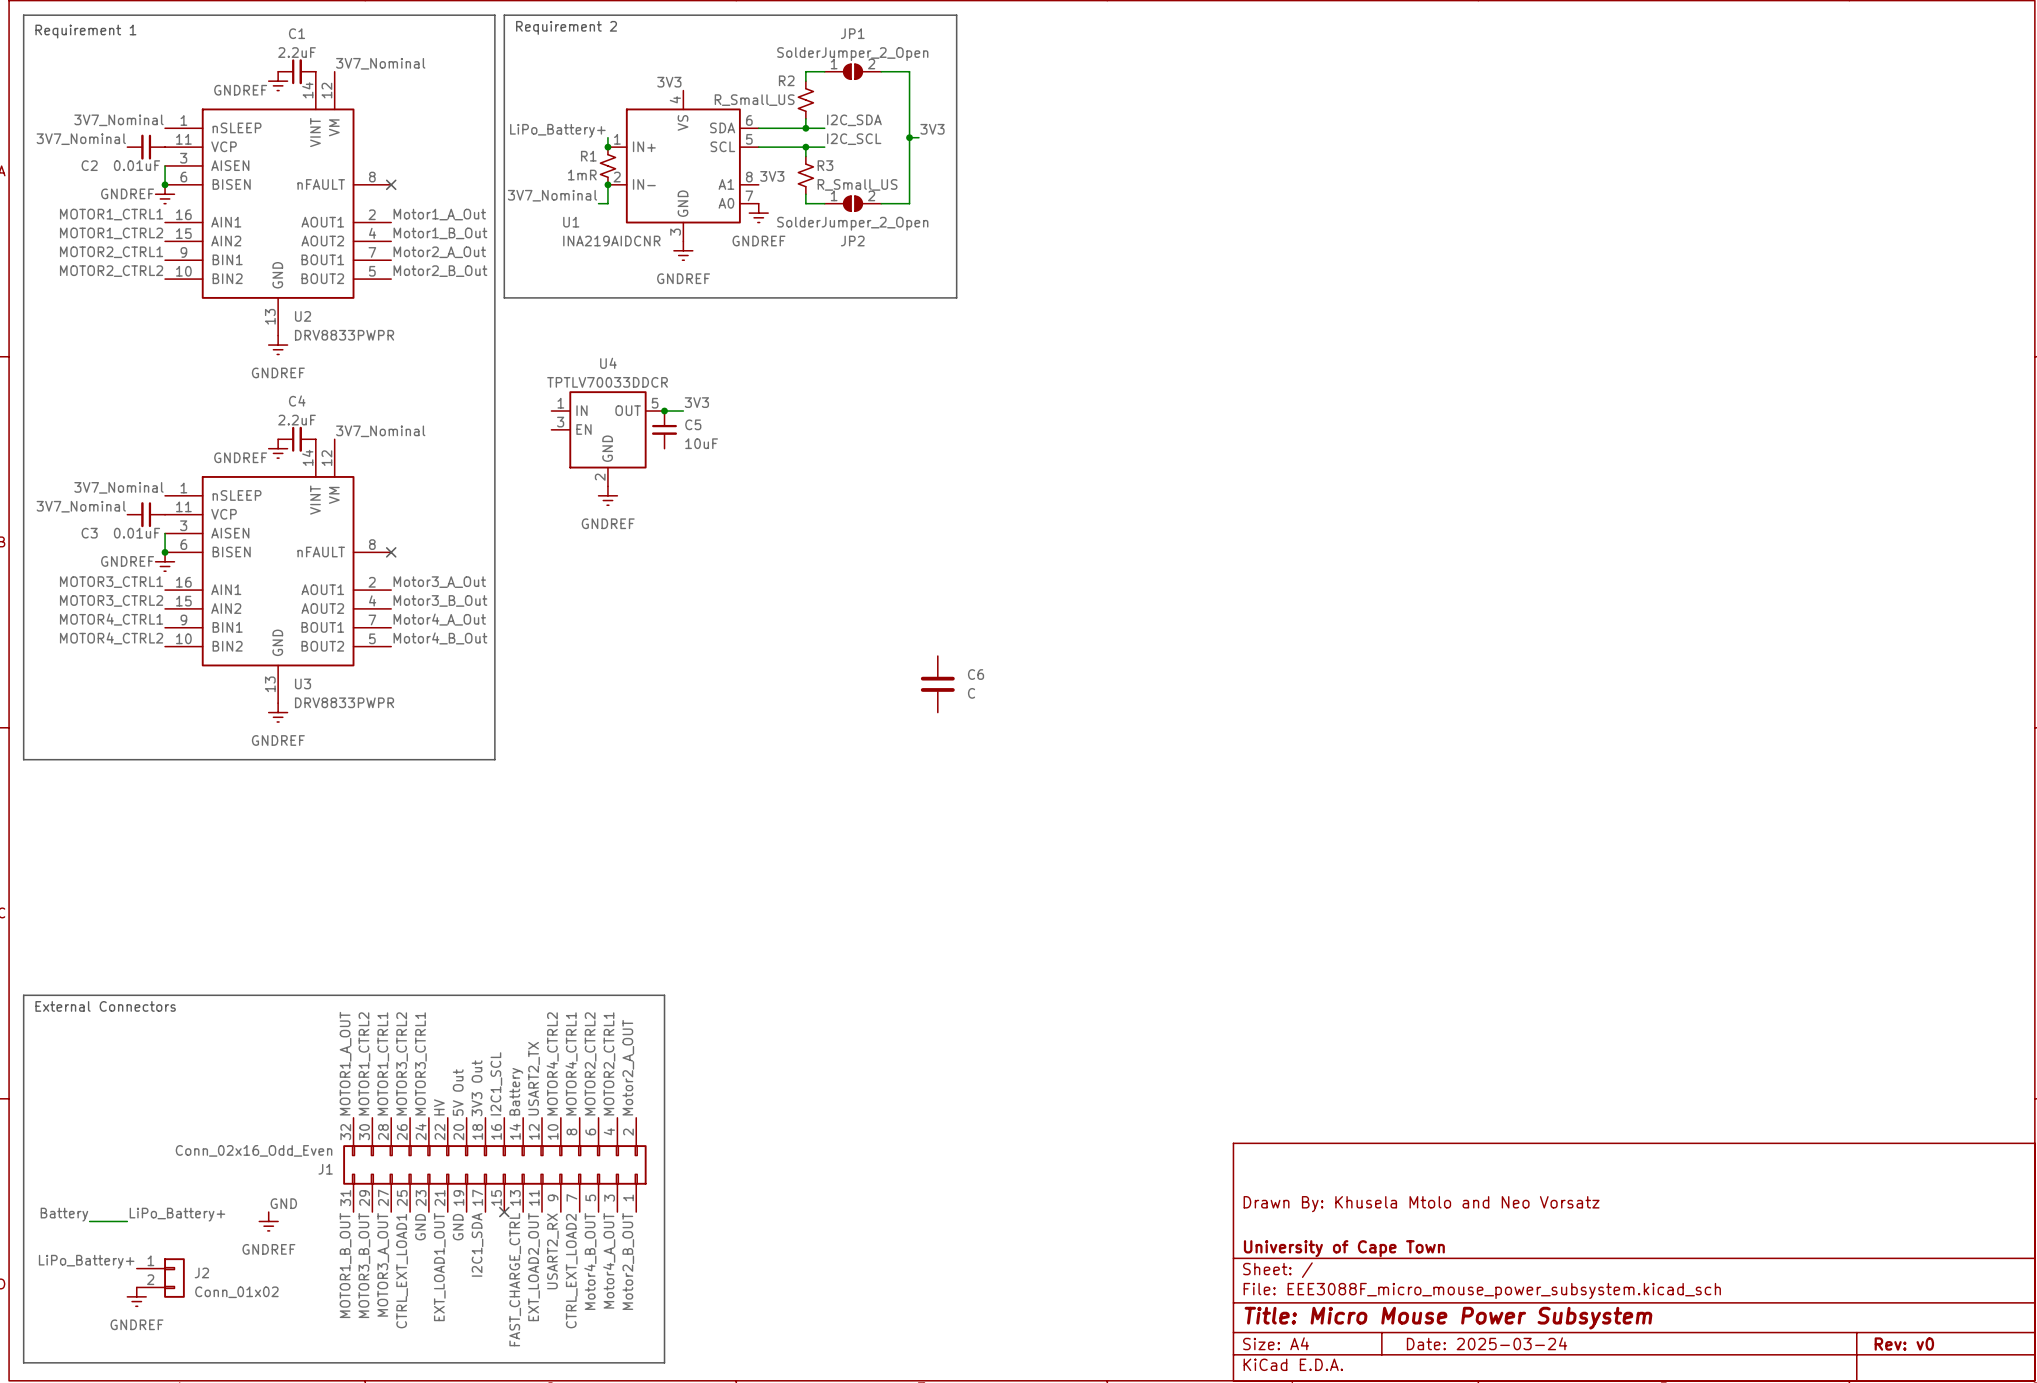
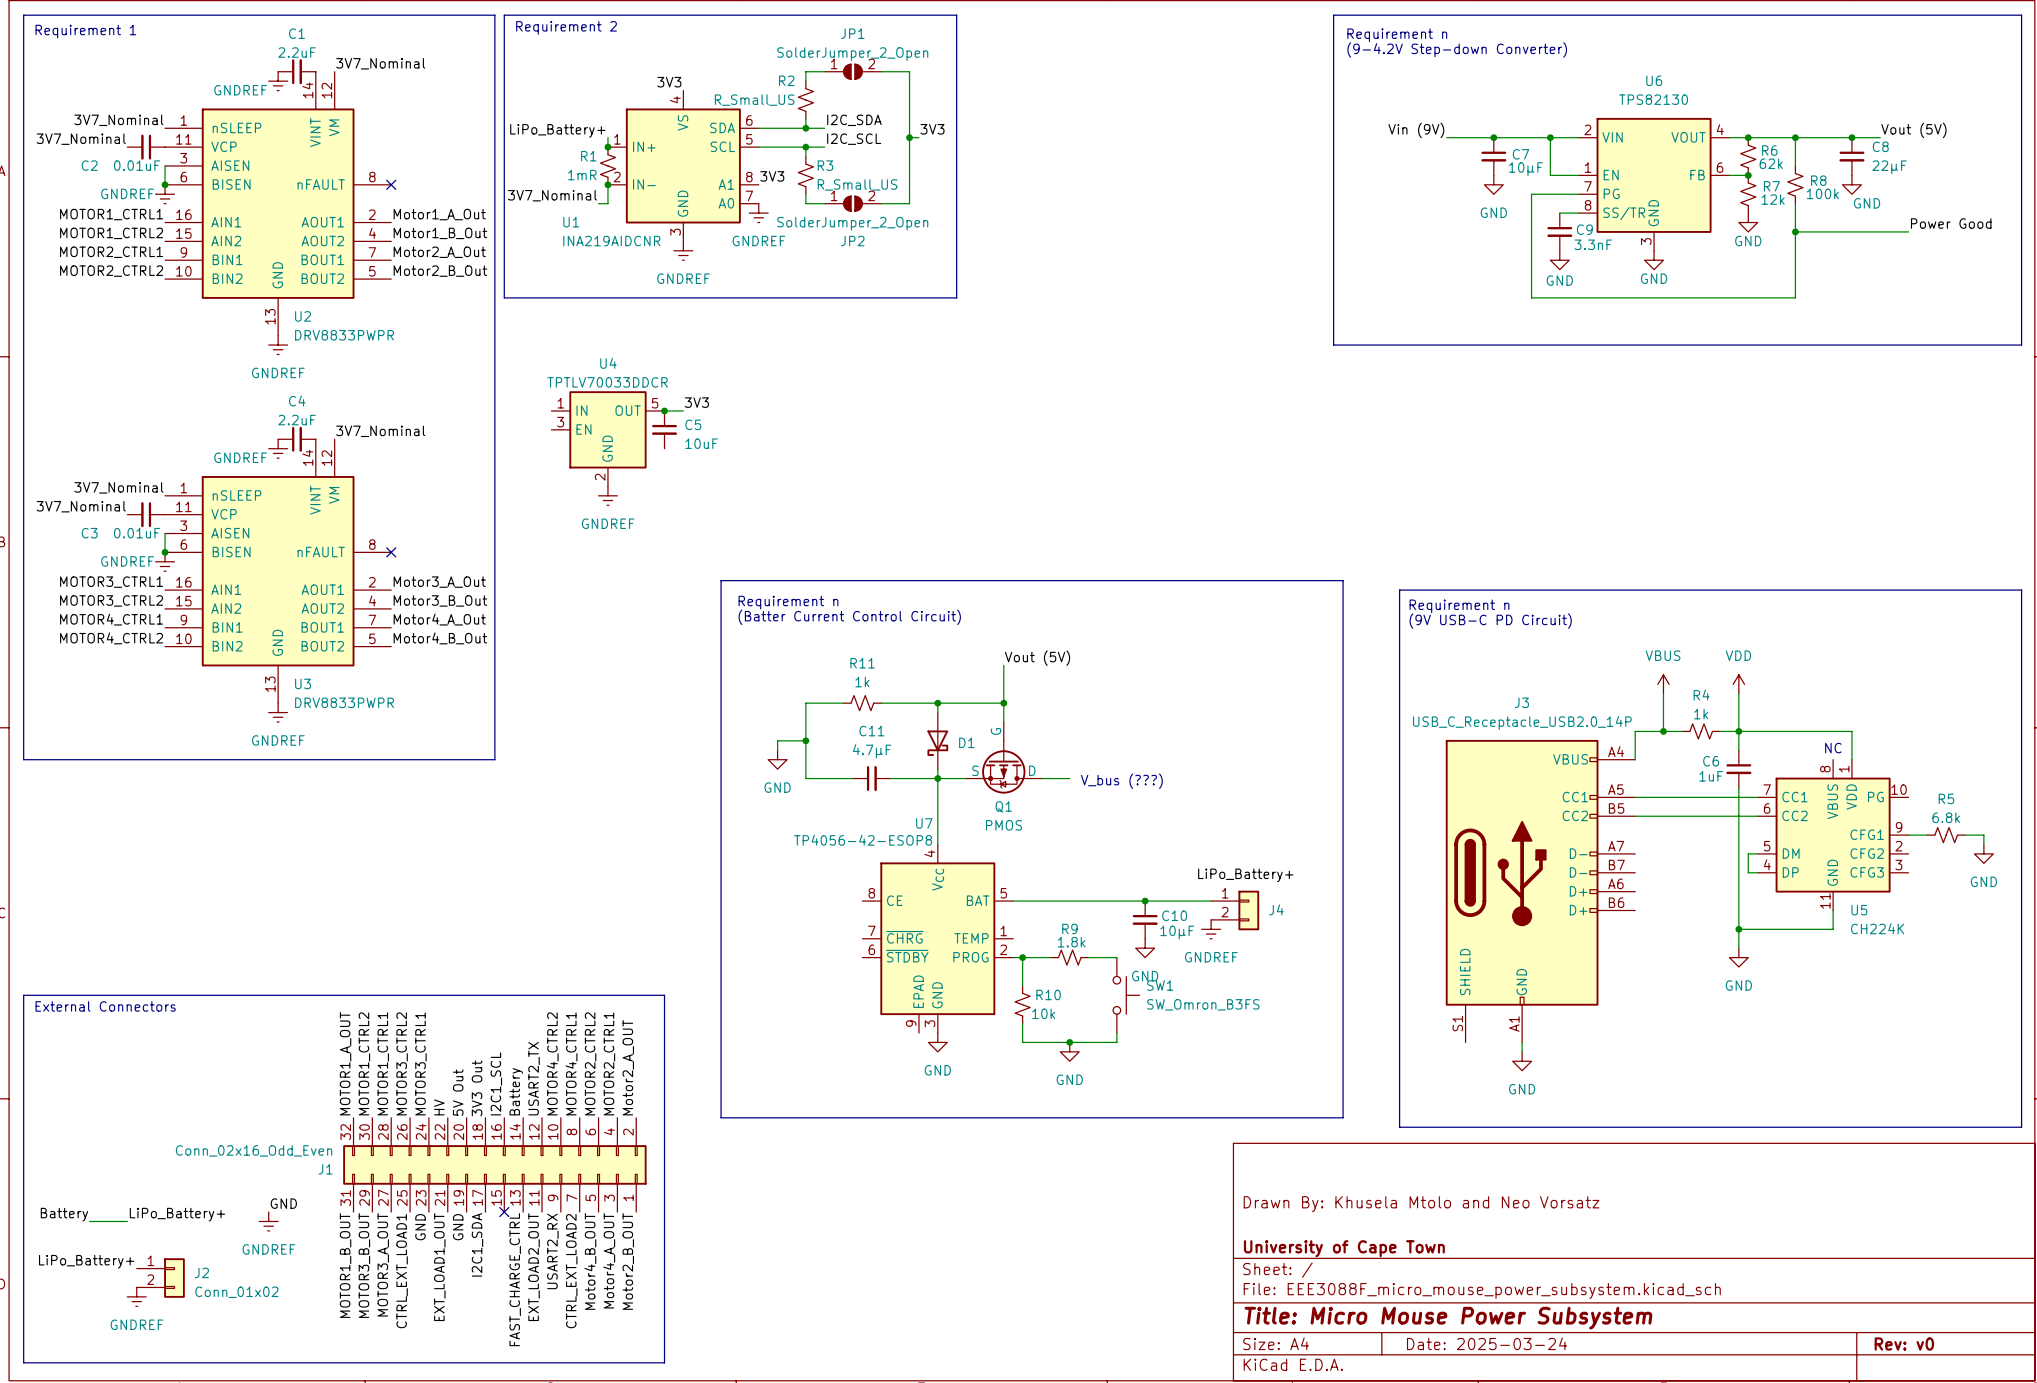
line: none -> (1333, 15) (2021, 15) (2021, 345) (1333, 345) (1333, 15)
text: none -> Requirement n (1397, 35)
text: none -> (9-4.2V Step-down Converter) (1457, 49)
label: none -> Vin (9V) (1416, 130)
label: none -> Vout (5V) (1913, 130)
wire: none -> (1446, 137) (1578, 137)
junction: none -> (1493, 137)
wire: none -> (1550, 137) (1550, 175) (1578, 175)
junction: none -> (1550, 137)
wire: none -> (1729, 137) (1880, 137)
junction: none -> (1748, 137)
wire: none -> (1795, 137) (1795, 165)
junction: none -> (1795, 137)
junction: none -> (1851, 137)
C7: none -> 10µF (1493, 156)
R6: none -> 62k (1748, 156)
C8: none -> 22µF (1851, 156)
wire: none -> (1729, 175) (1748, 175)
junction: none -> (1748, 175)
power symbol: none -> GND (1493, 184)
U6: none -> TPS82130 (1654, 184)
R8: none -> 100k (1795, 184)
power symbol: none -> GND (1851, 184)
wire: none -> (1578, 194) (1531, 194) (1531, 297) (1795, 297) (1795, 203)
R7: none -> 12k (1748, 194)
wire: none -> (1559, 213) (1578, 213)
power symbol: none -> GND (1748, 222)
label: none -> Power Good (1951, 223)
C9: none -> 3.3nF (1559, 231)
wire: none -> (1795, 231) (1908, 231)
junction: none -> (1795, 231)
power symbol: none -> GND (1559, 260)
power symbol: none -> GND (1654, 260)
line: none -> (721, 580) (1343, 580) (1343, 1117) (721, 1117) (721, 580)
line: none -> (1399, 590) (2021, 590) (2021, 1127) (1399, 1127) (1399, 590)
text: none -> Requirement n (788, 602)
text: none -> Requirement n (1459, 606)
text: none -> (Batter Current Control Circuit) (849, 617)
text: none -> (9V USB-C PD Circuit) (1490, 621)
C6 symbol: [920, 656, 955, 713] -> [1726, 750, 1752, 788]
label: none -> Vout (5V) (1037, 658)
wire: none -> (1003, 665) (1003, 722)
C6 name position: C6 (976, 674) -> C6 (1711, 761)
power symbol: none -> VBUS (1663, 684)
power symbol: none -> VDD (1738, 684)
C6 value: C (971, 693) -> 1uF (1711, 776)
wire: none -> (1663, 693) (1663, 731)
wire: none -> (1738, 693) (1738, 750)
wire: none -> (843, 703) (805, 703) (805, 778) (852, 778)
R11: none -> 1k (862, 703)
wire: none -> (881, 703) (1003, 703)
junction: none -> (937, 703)
junction: none -> (1003, 703)
junction: none -> (1663, 731)
wire: none -> (1682, 731) (1635, 731) (1635, 759)
R4: none -> 1k (1701, 731)
wire: none -> (1720, 731) (1851, 731) (1851, 759)
junction: none -> (1738, 731)
wire: none -> (805, 740) (777, 740) (777, 750)
junction: none -> (805, 740)
D1: none -> (937, 740)
text: none -> NC (1833, 748)
Q1: none -> PMOS (1003, 757)
power symbol: none -> GND (777, 759)
wire: none -> (937, 769) (937, 844)
C11: none -> 4.7µF (871, 778)
wire: none -> (890, 778) (966, 778)
junction: none -> (937, 778)
wire: none -> (1041, 778) (1069, 778)
text: none -> V_bus (???) (1121, 781)
wire: none -> (1738, 787) (1738, 948)
wire: none -> (1635, 797) (1757, 797)
wire: none -> (1635, 816) (1757, 816)
U5: none -> CH224K (1833, 835)
wire: none -> (1908, 835) (1927, 835)
R5: none -> 6.8k (1946, 835)
wire: none -> (1965, 835) (1983, 835) (1983, 844)
wire: none -> (1757, 853) (1748, 853) (1748, 872) (1757, 872)
power symbol: none -> GND (1983, 853)
label: none -> LiPo_Battery+ (1245, 875)
J3: none -> USB_C_Receptacle_USB2.0_14P (1540, 891)
wire: none -> (1013, 901) (1211, 901)
junction: none -> (1145, 901)
J4: none -> (1235, 910)
wire: none -> (1833, 910) (1833, 929) (1738, 929)
C10: none -> 10µF (1145, 919)
power symbol: none -> GNDREF (1211, 929)
junction: none -> (1738, 929)
U7: none -> TP4056-42-ESOP8 (937, 938)
power symbol: none -> GND (1145, 948)
wire: none -> (1013, 957) (1050, 957)
wire: none -> (1022, 957) (1022, 985)
junction: none -> (1022, 957)
R9: none -> 1.8k (1069, 957)
wire: none -> (1088, 957) (1116, 957)
power symbol: none -> GND (1738, 957)
SW1: none -> SW_Omron_B3FS (1126, 995)
R10: none -> 10k (1022, 1004)
wire: none -> (1022, 1023) (1022, 1042) (1116, 1042) (1116, 1033)
power symbol: none -> GND (937, 1042)
junction: none -> (1069, 1042)
wire: none -> (1522, 1042) (1522, 1051)
power symbol: none -> GND (1069, 1051)
power symbol: none -> GND (1522, 1061)

